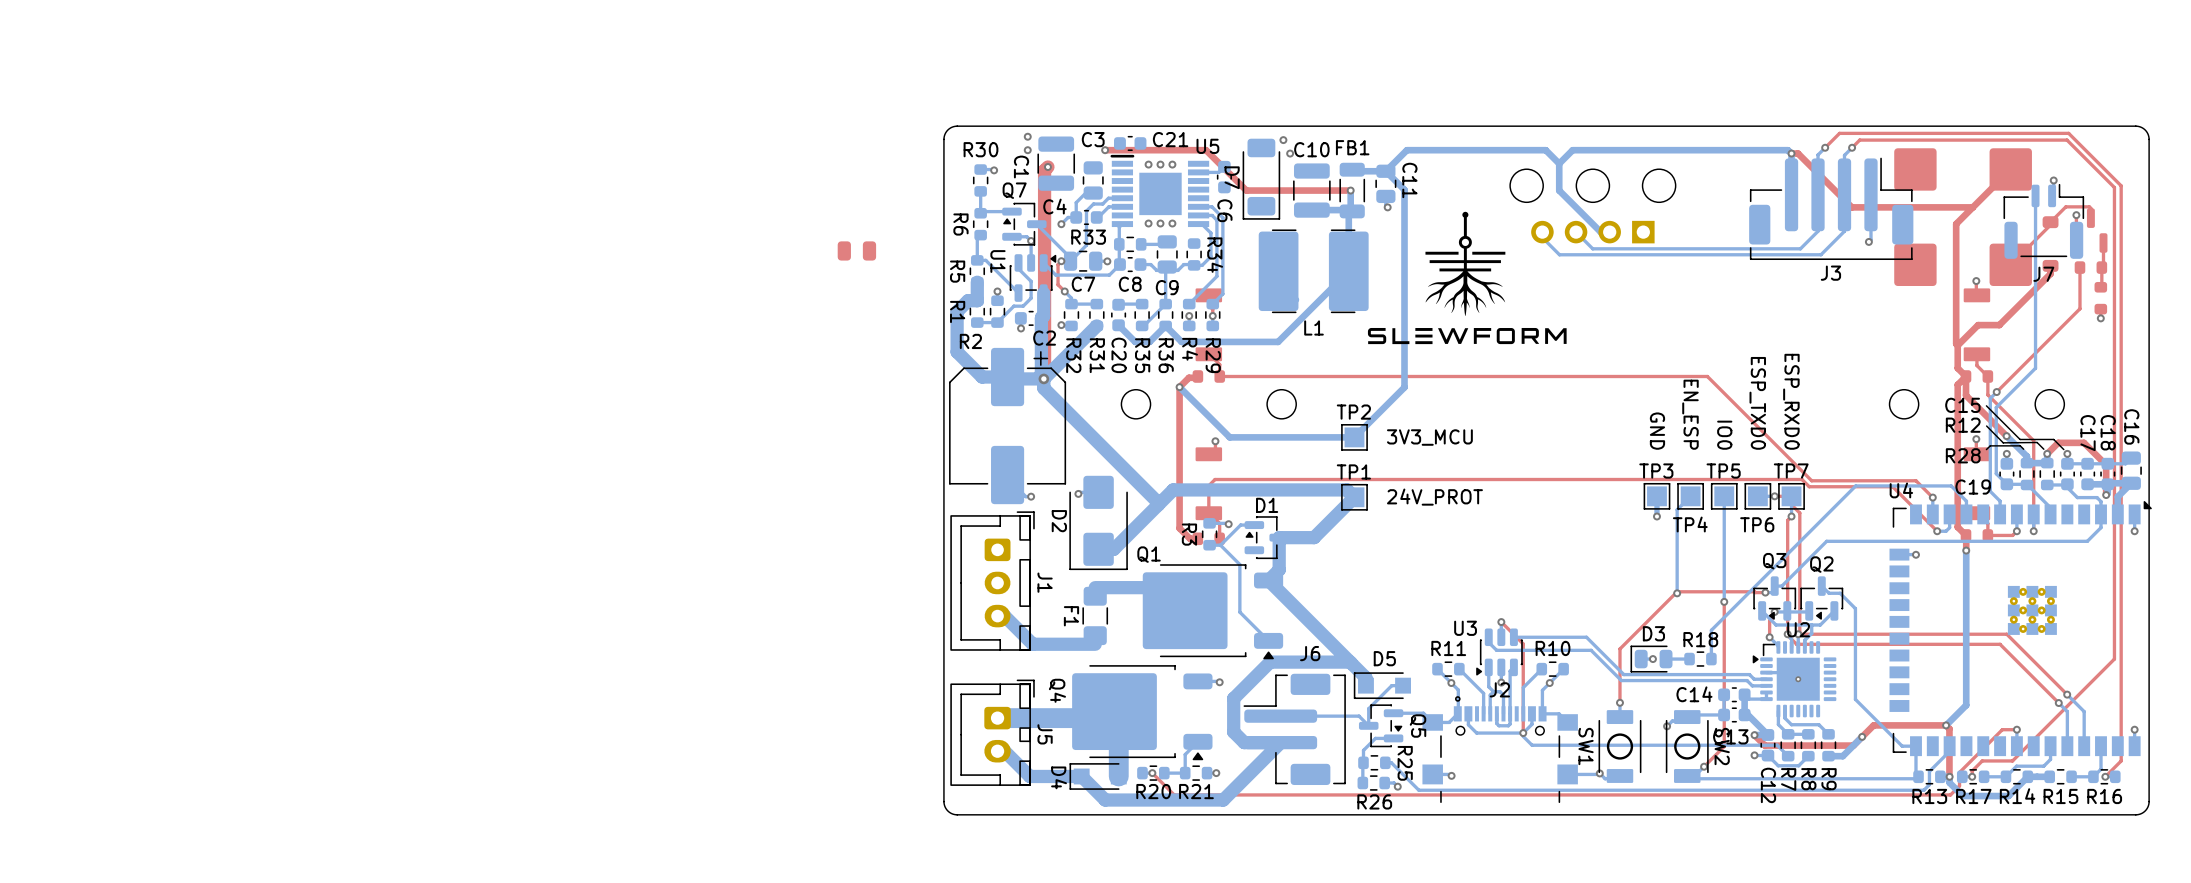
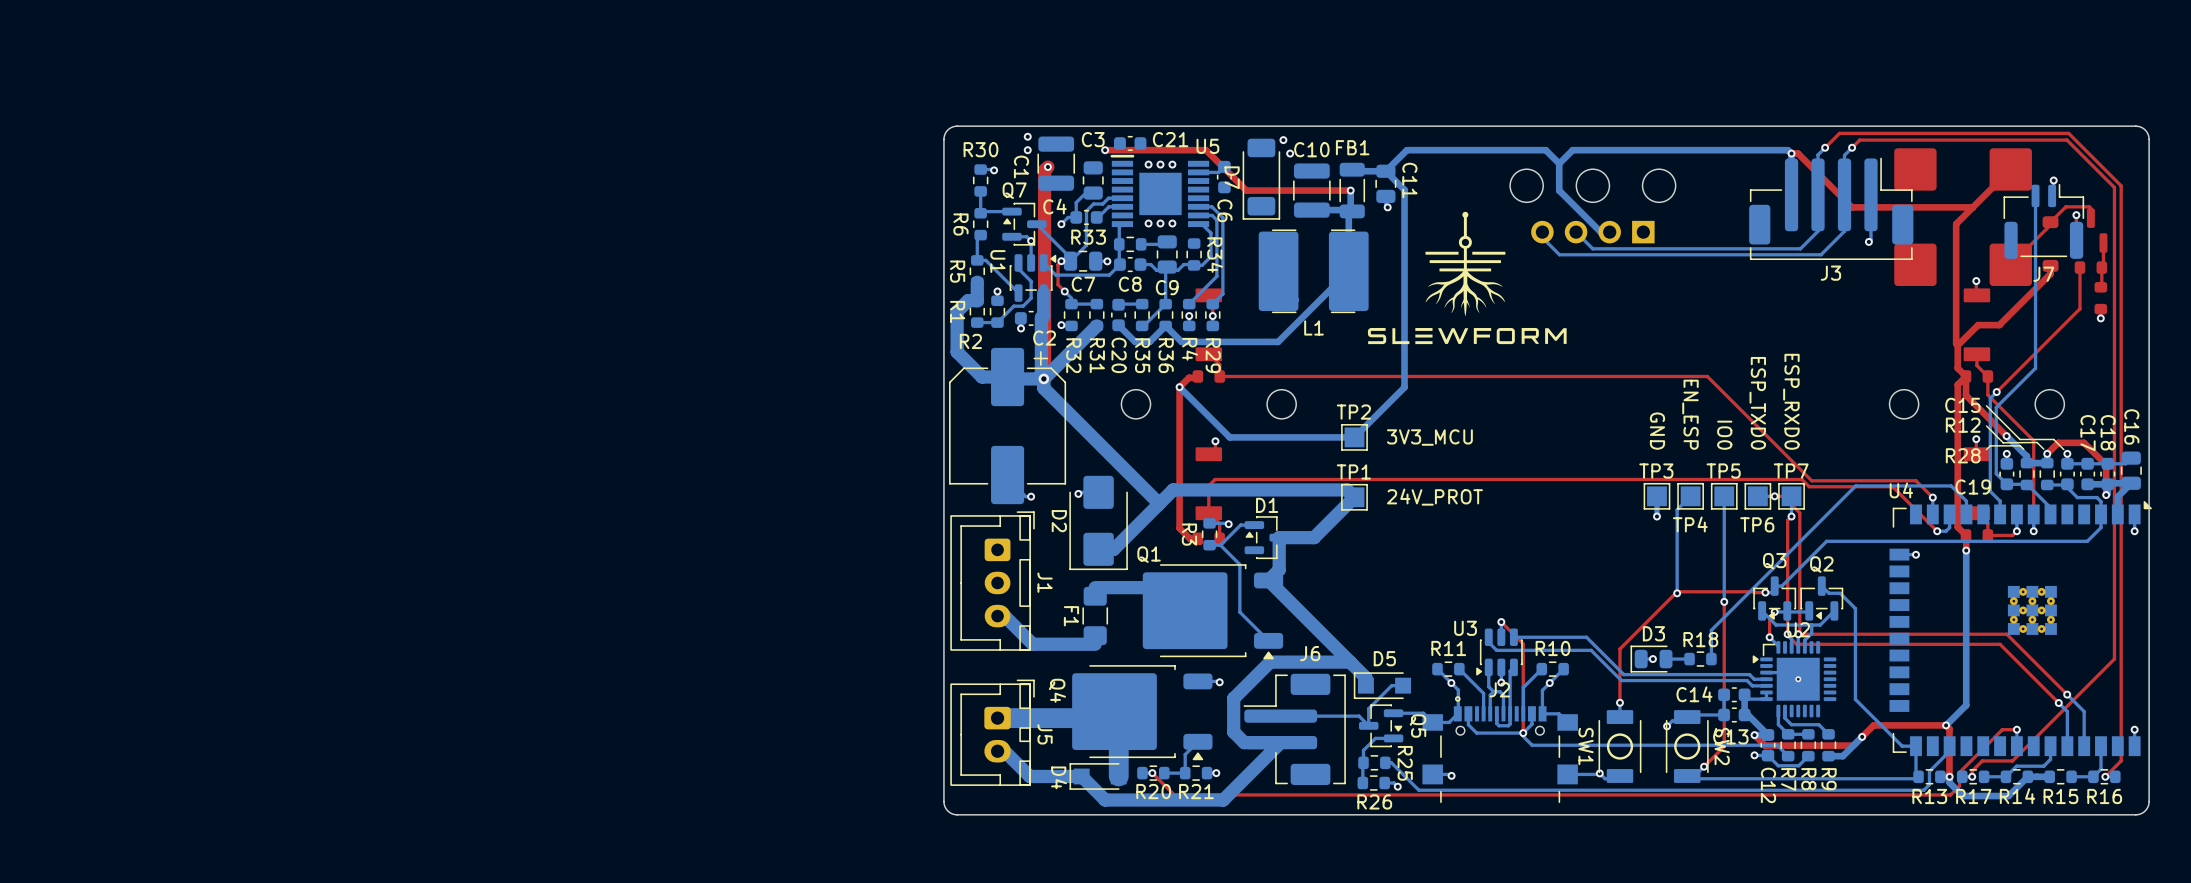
part: (856, 250) -> none

